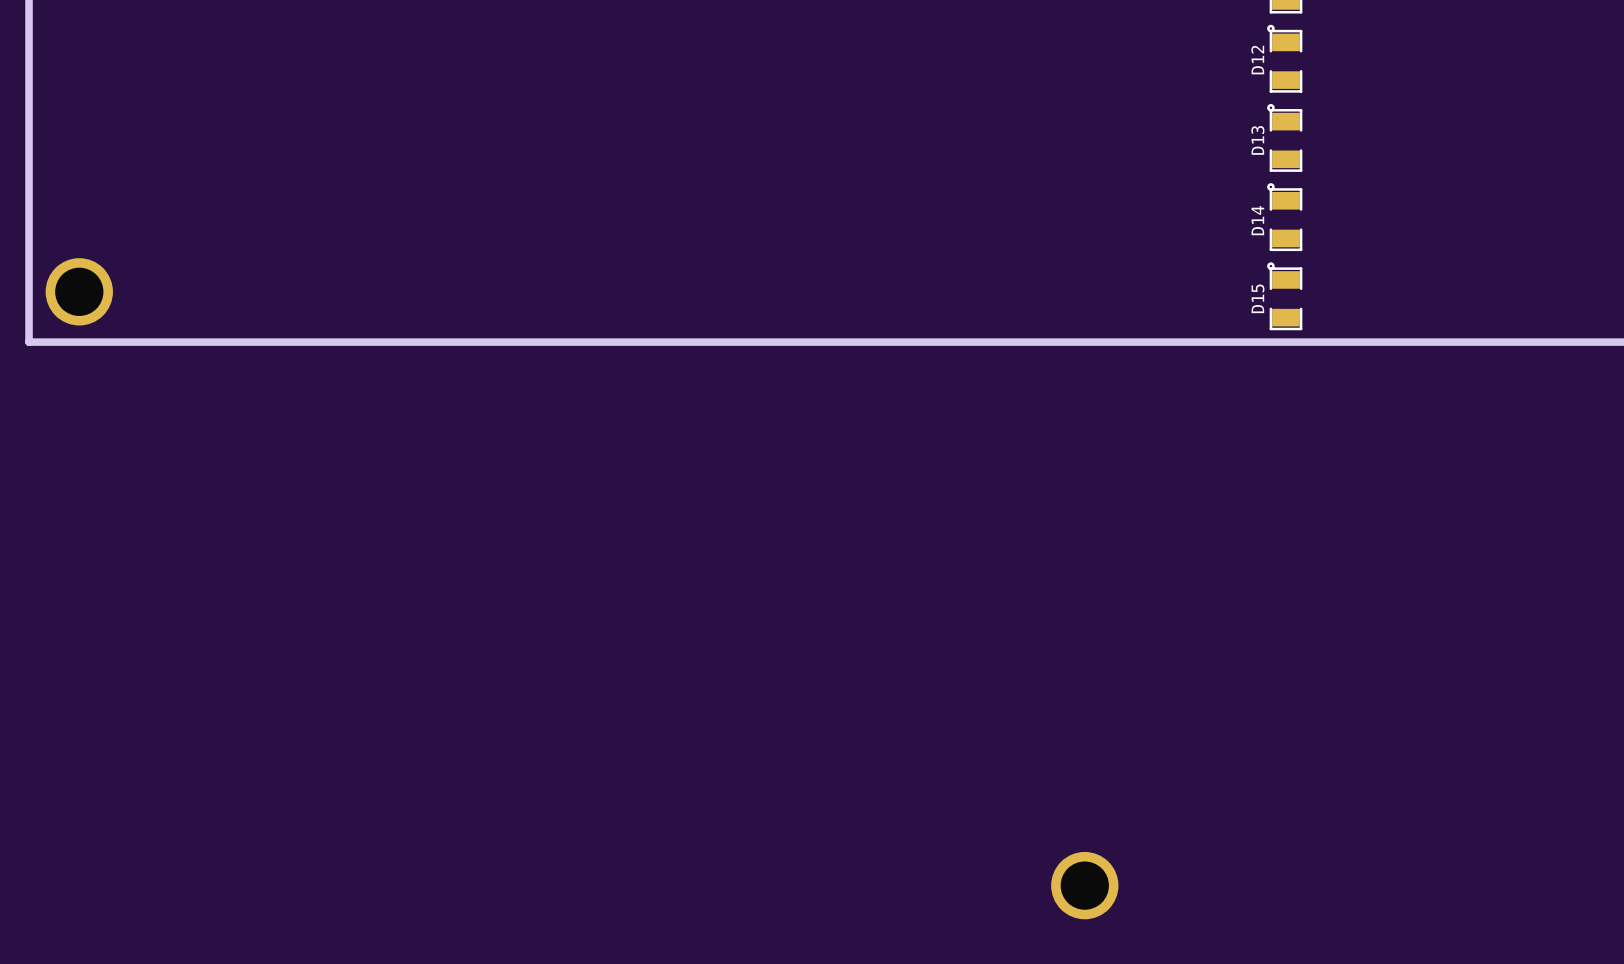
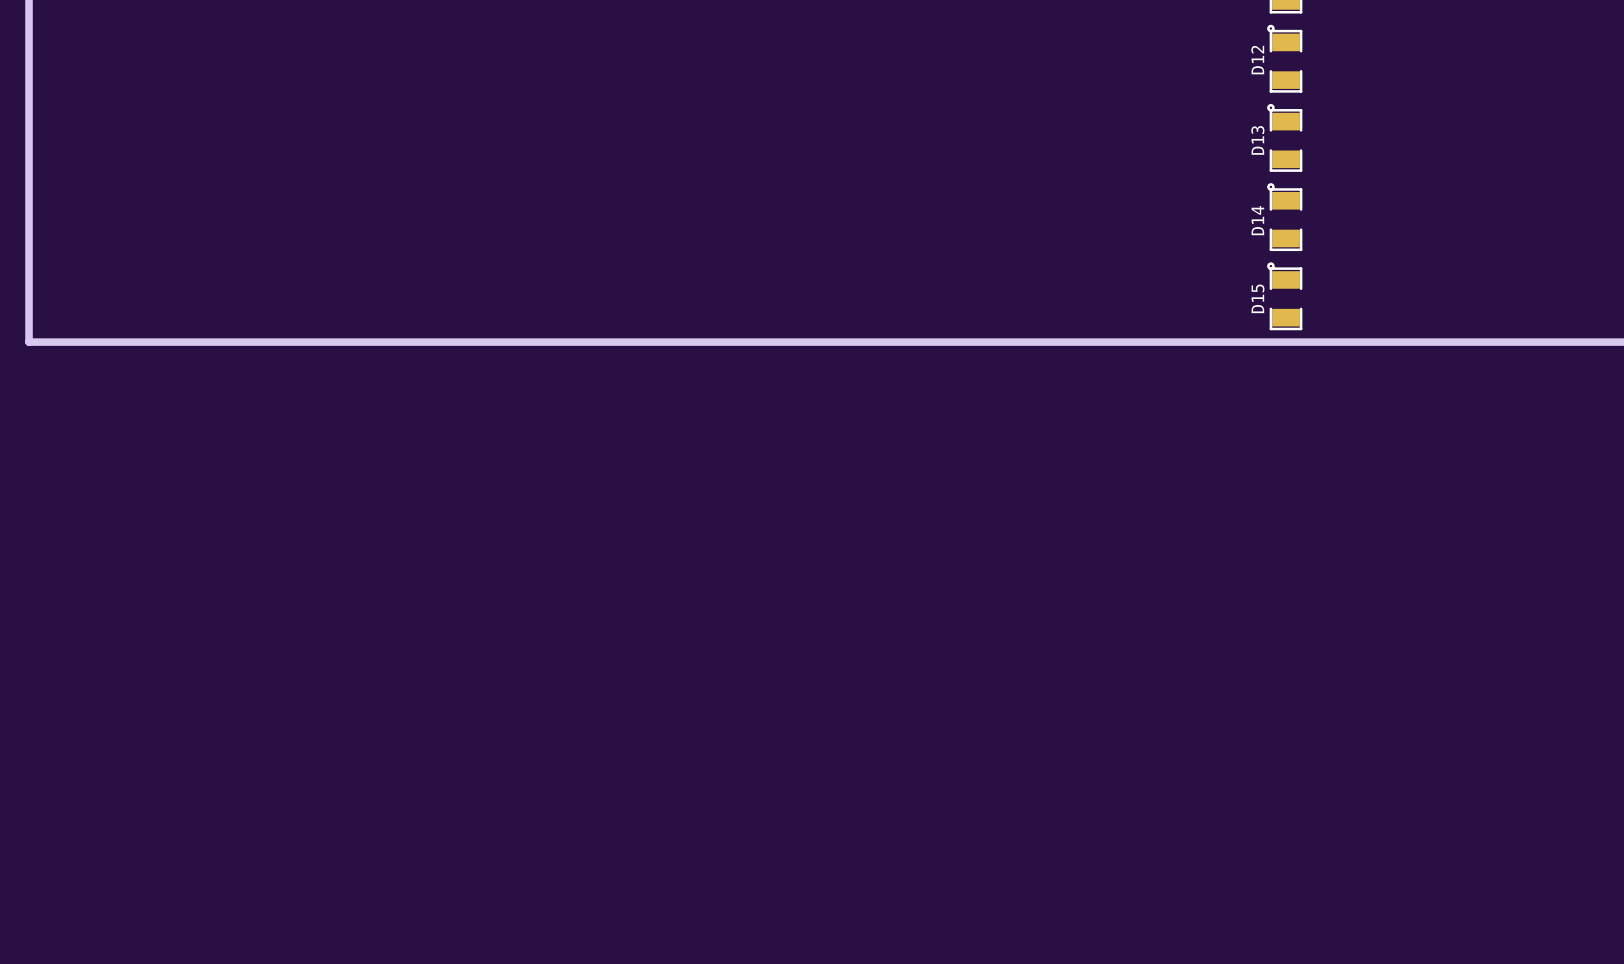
part: (79, 291) -> none
part: (1084, 885) -> none

